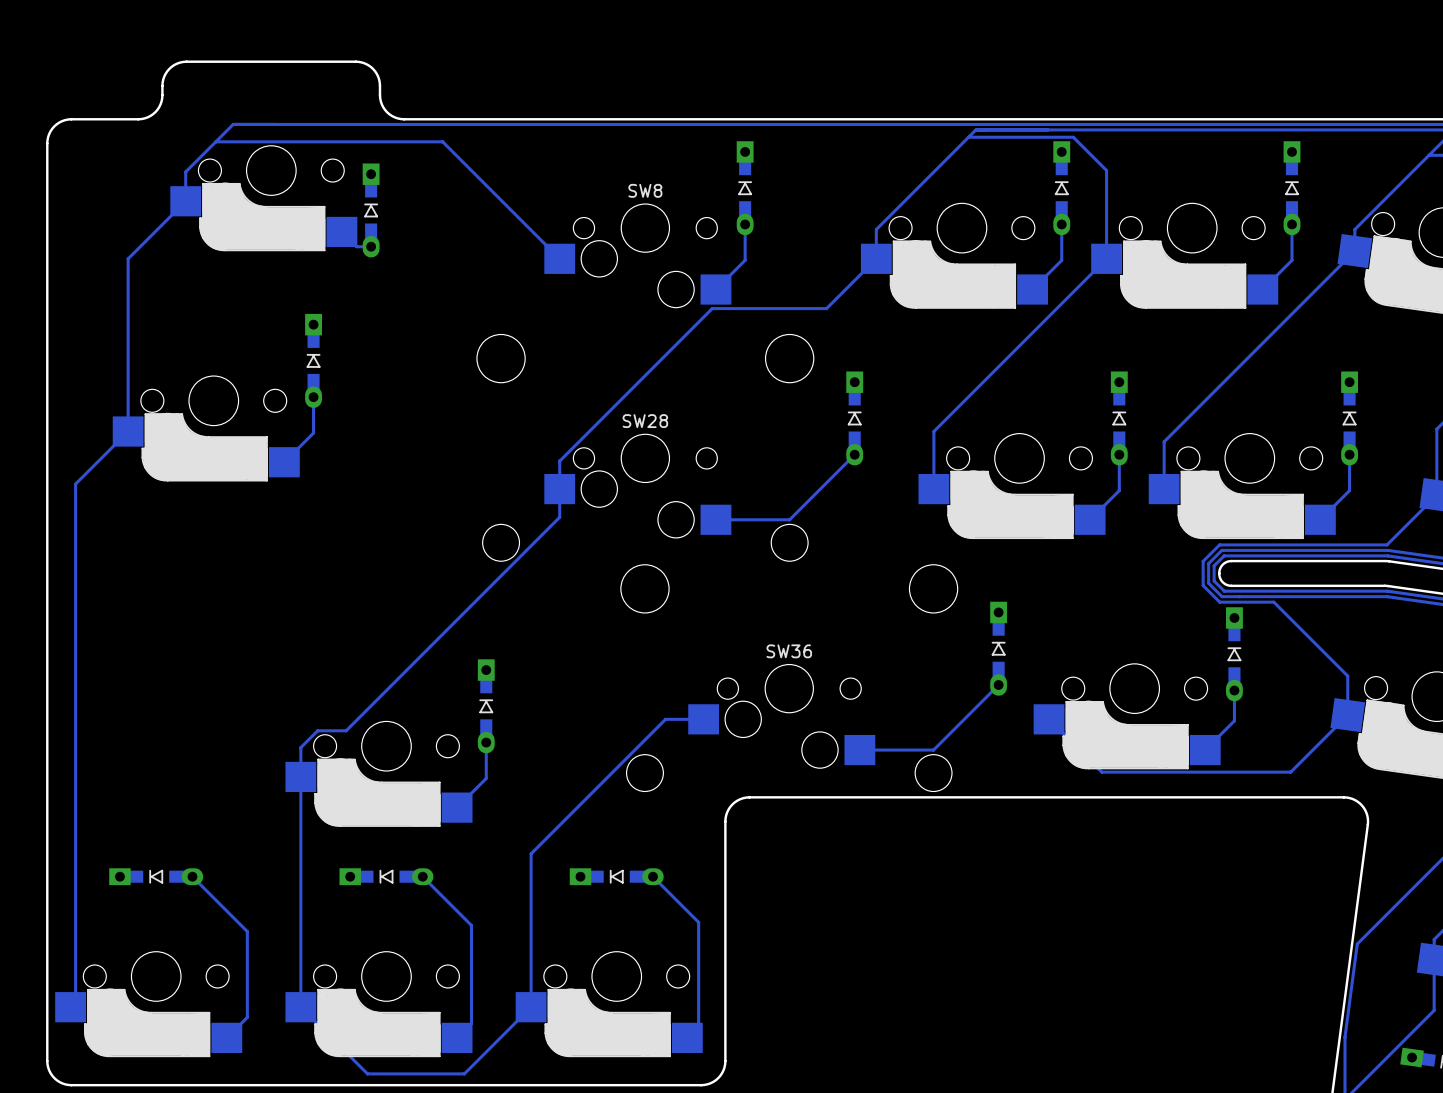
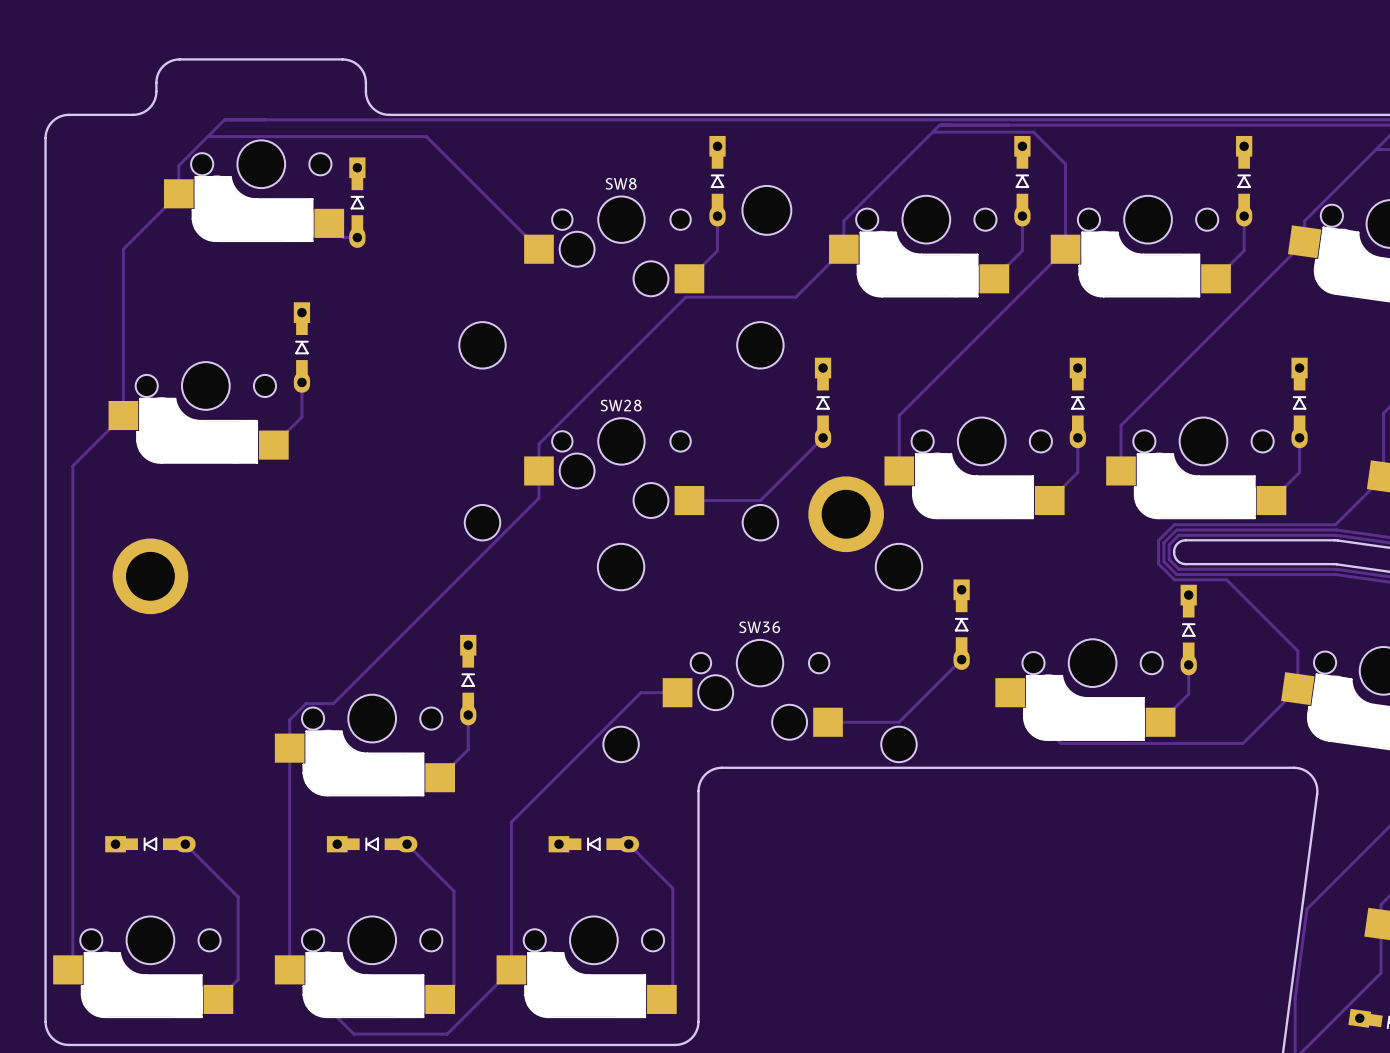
part: none -> (766, 210)
part: none -> (846, 514)
part: none -> (150, 576)

